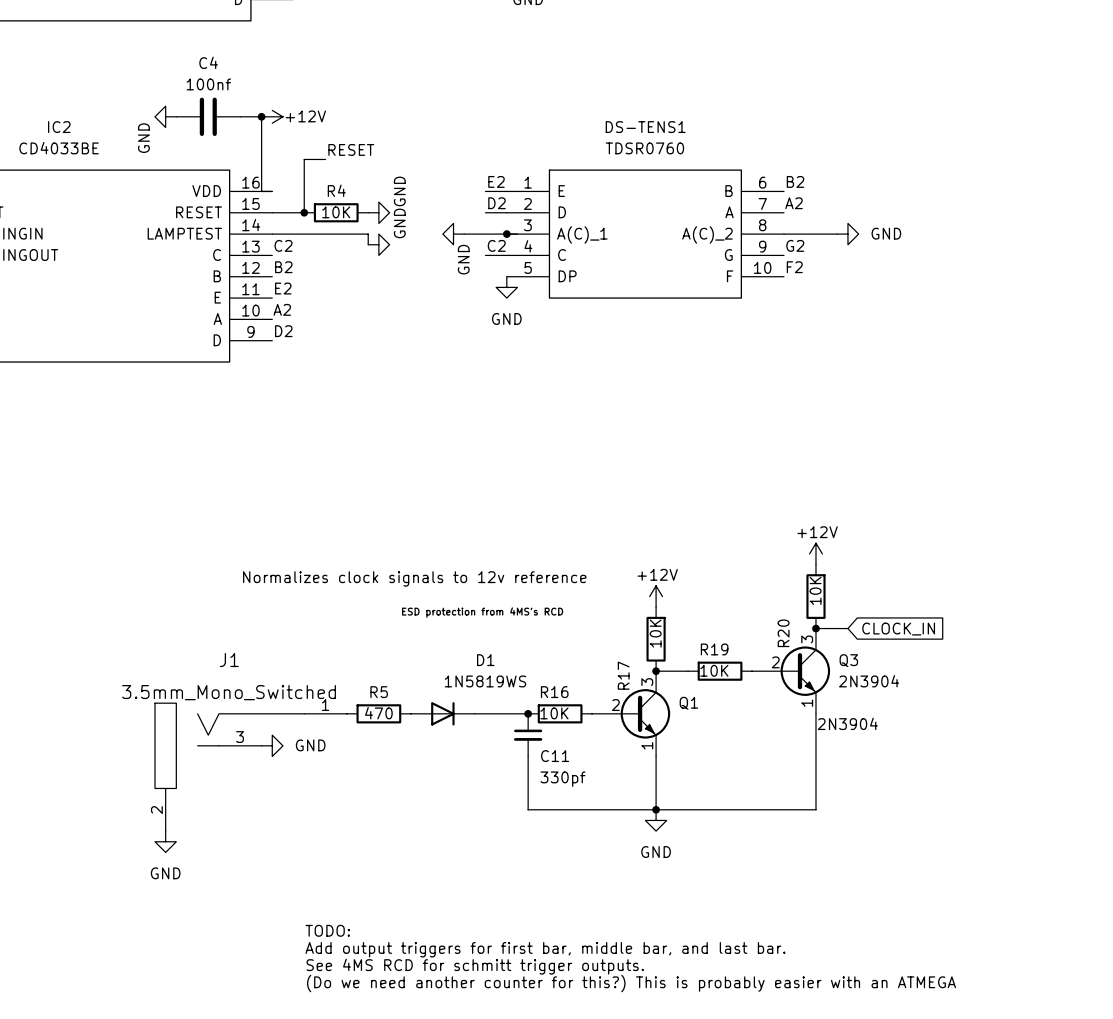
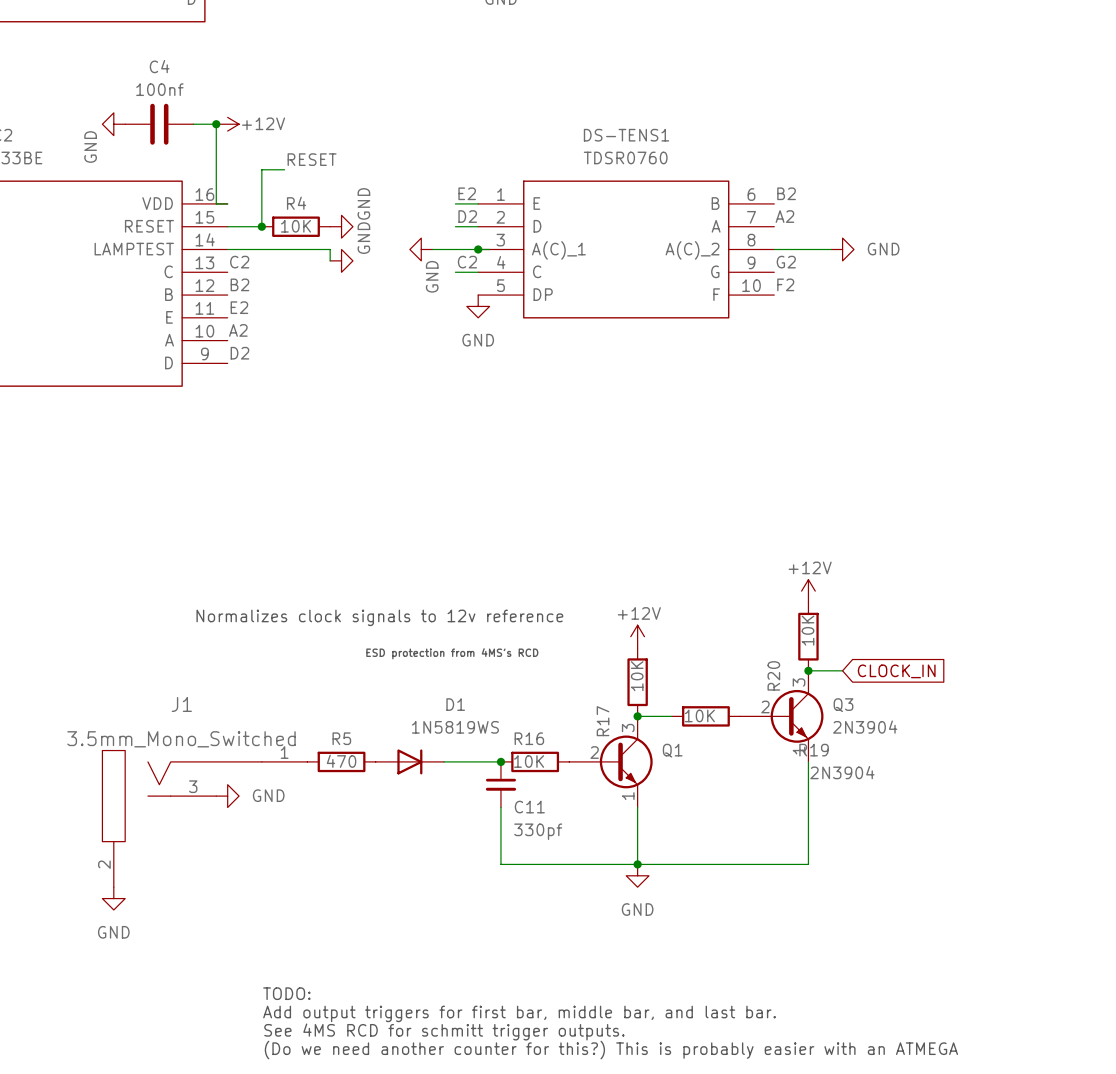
R19 name position: R19 (714, 649) -> R19 (814, 750)

